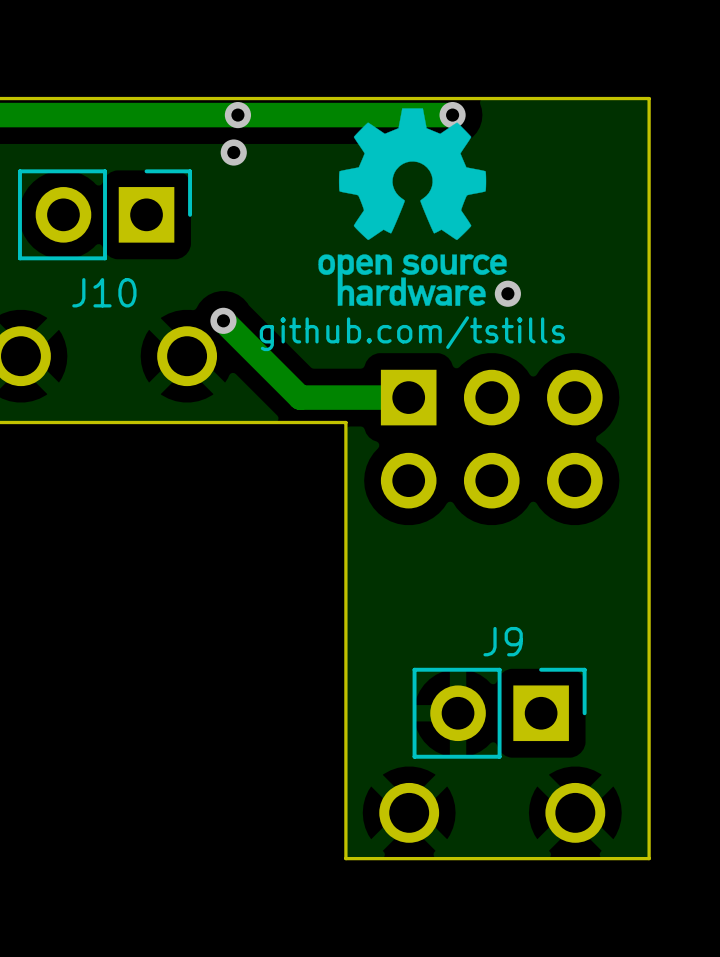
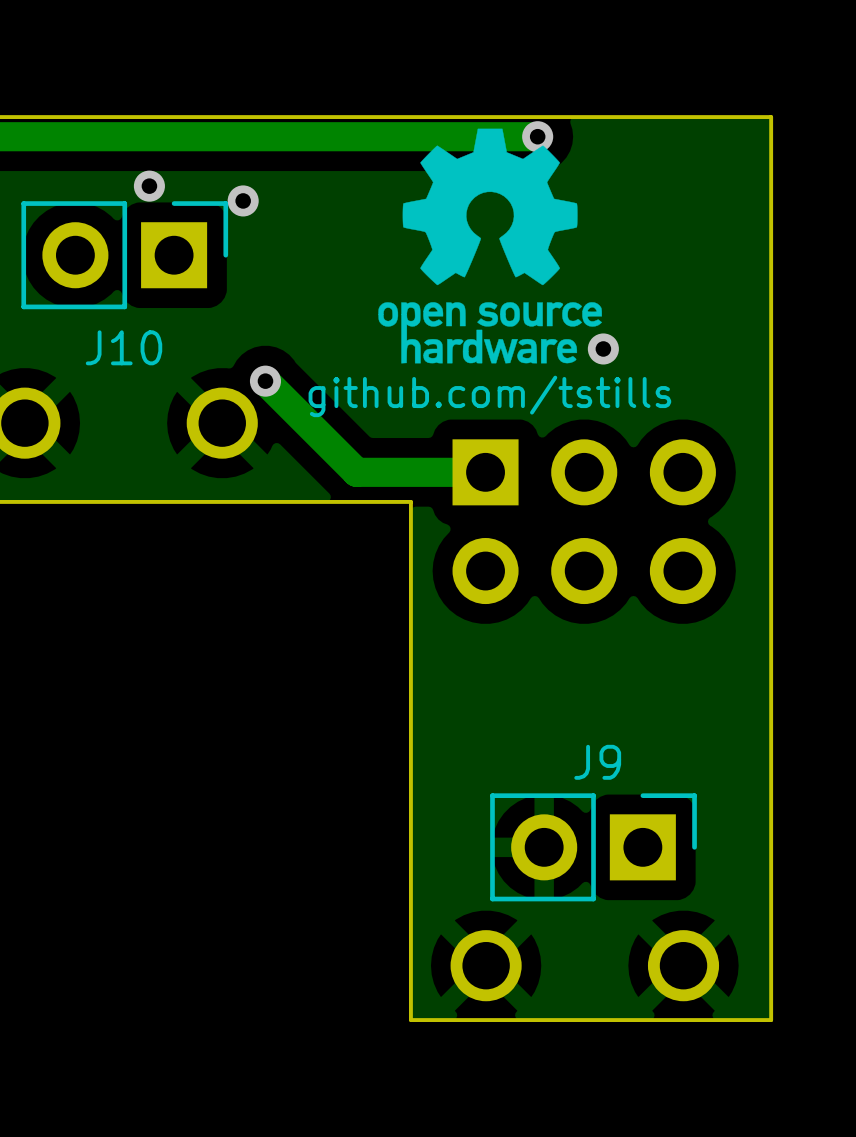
via: (237, 115) -> none
via: (233, 152) -> none
via: none -> (149, 186)
via: none -> (243, 200)

